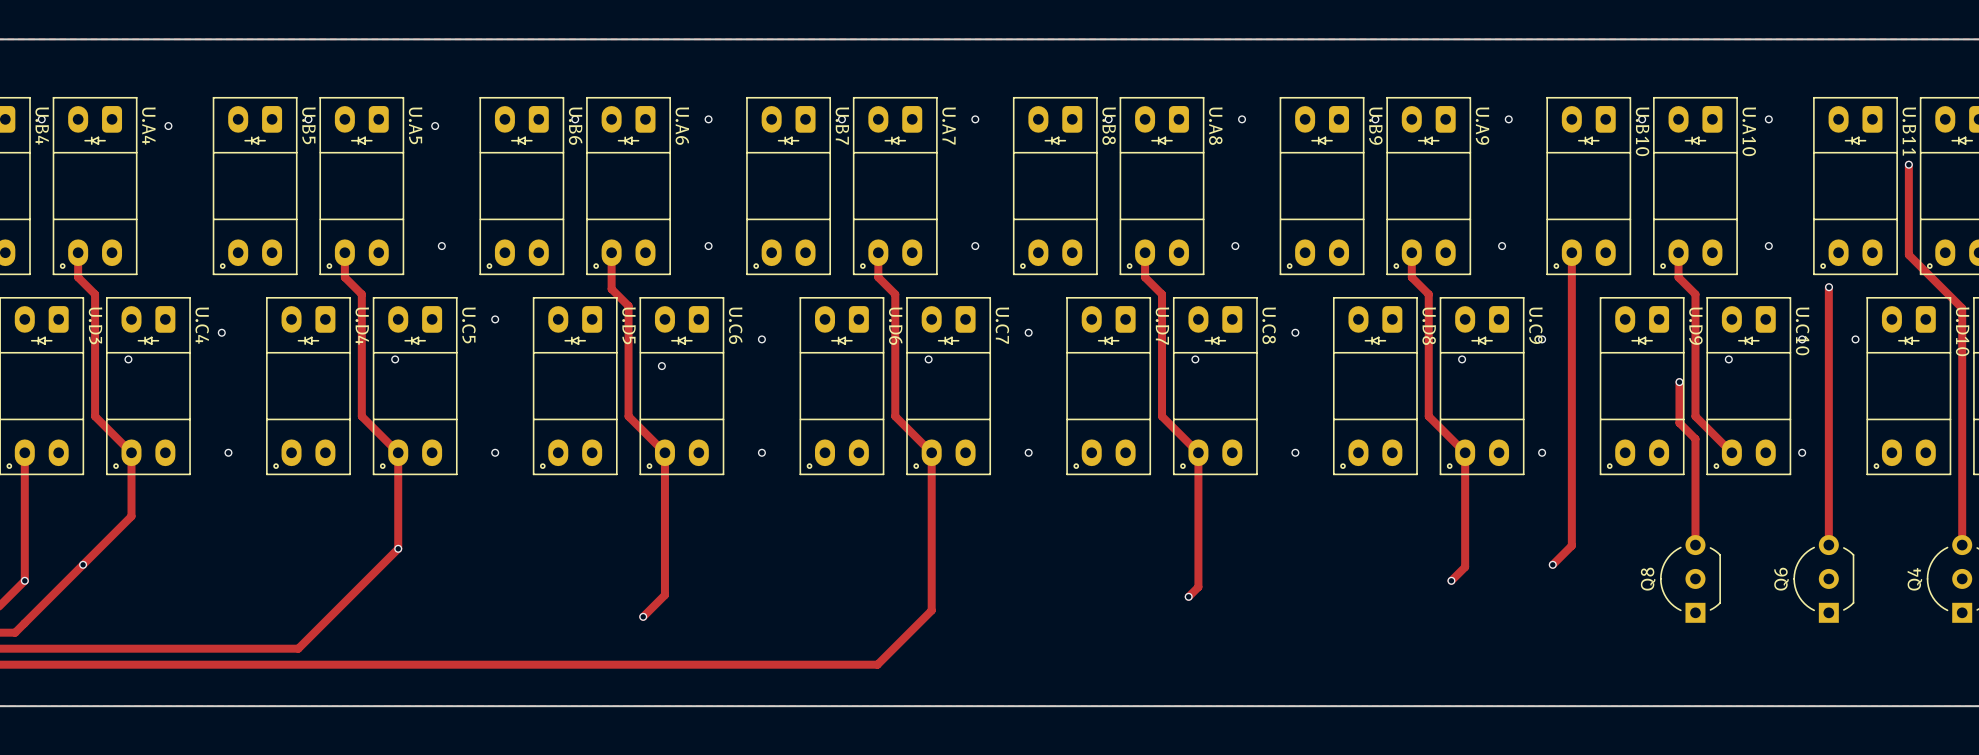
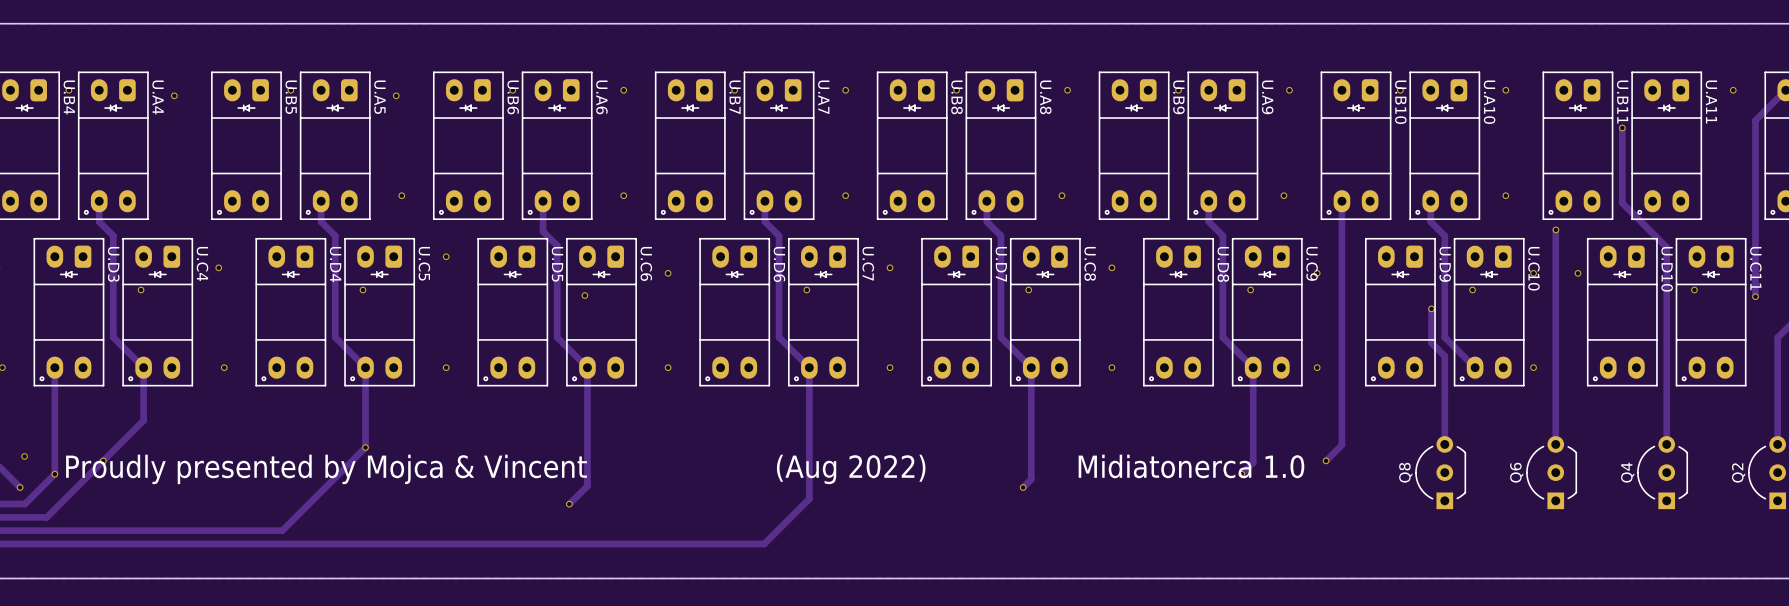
text: none -> Midiatonerca 1.0 (1191, 466)
text: none -> Proudly presented by Mojca & Vincent (326, 469)
text: none -> (Aug 2022) (851, 469)

